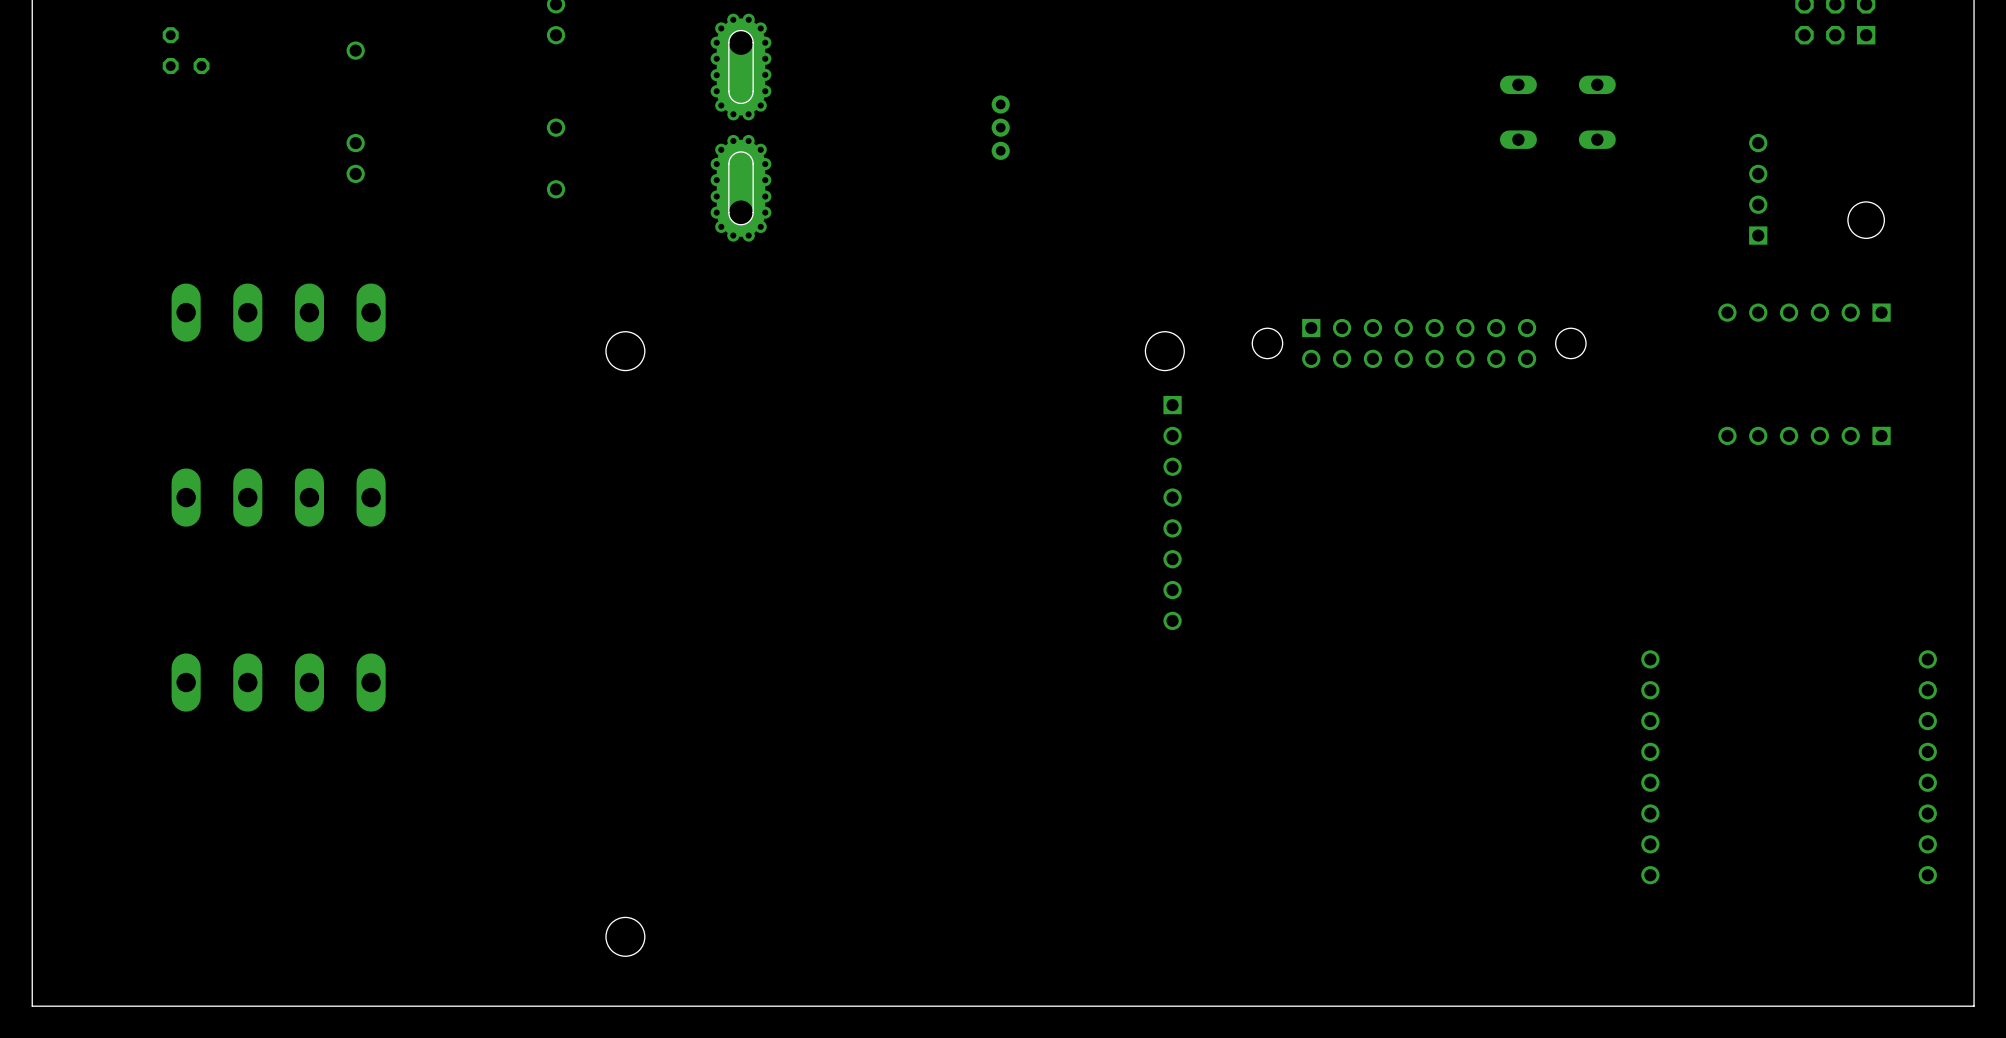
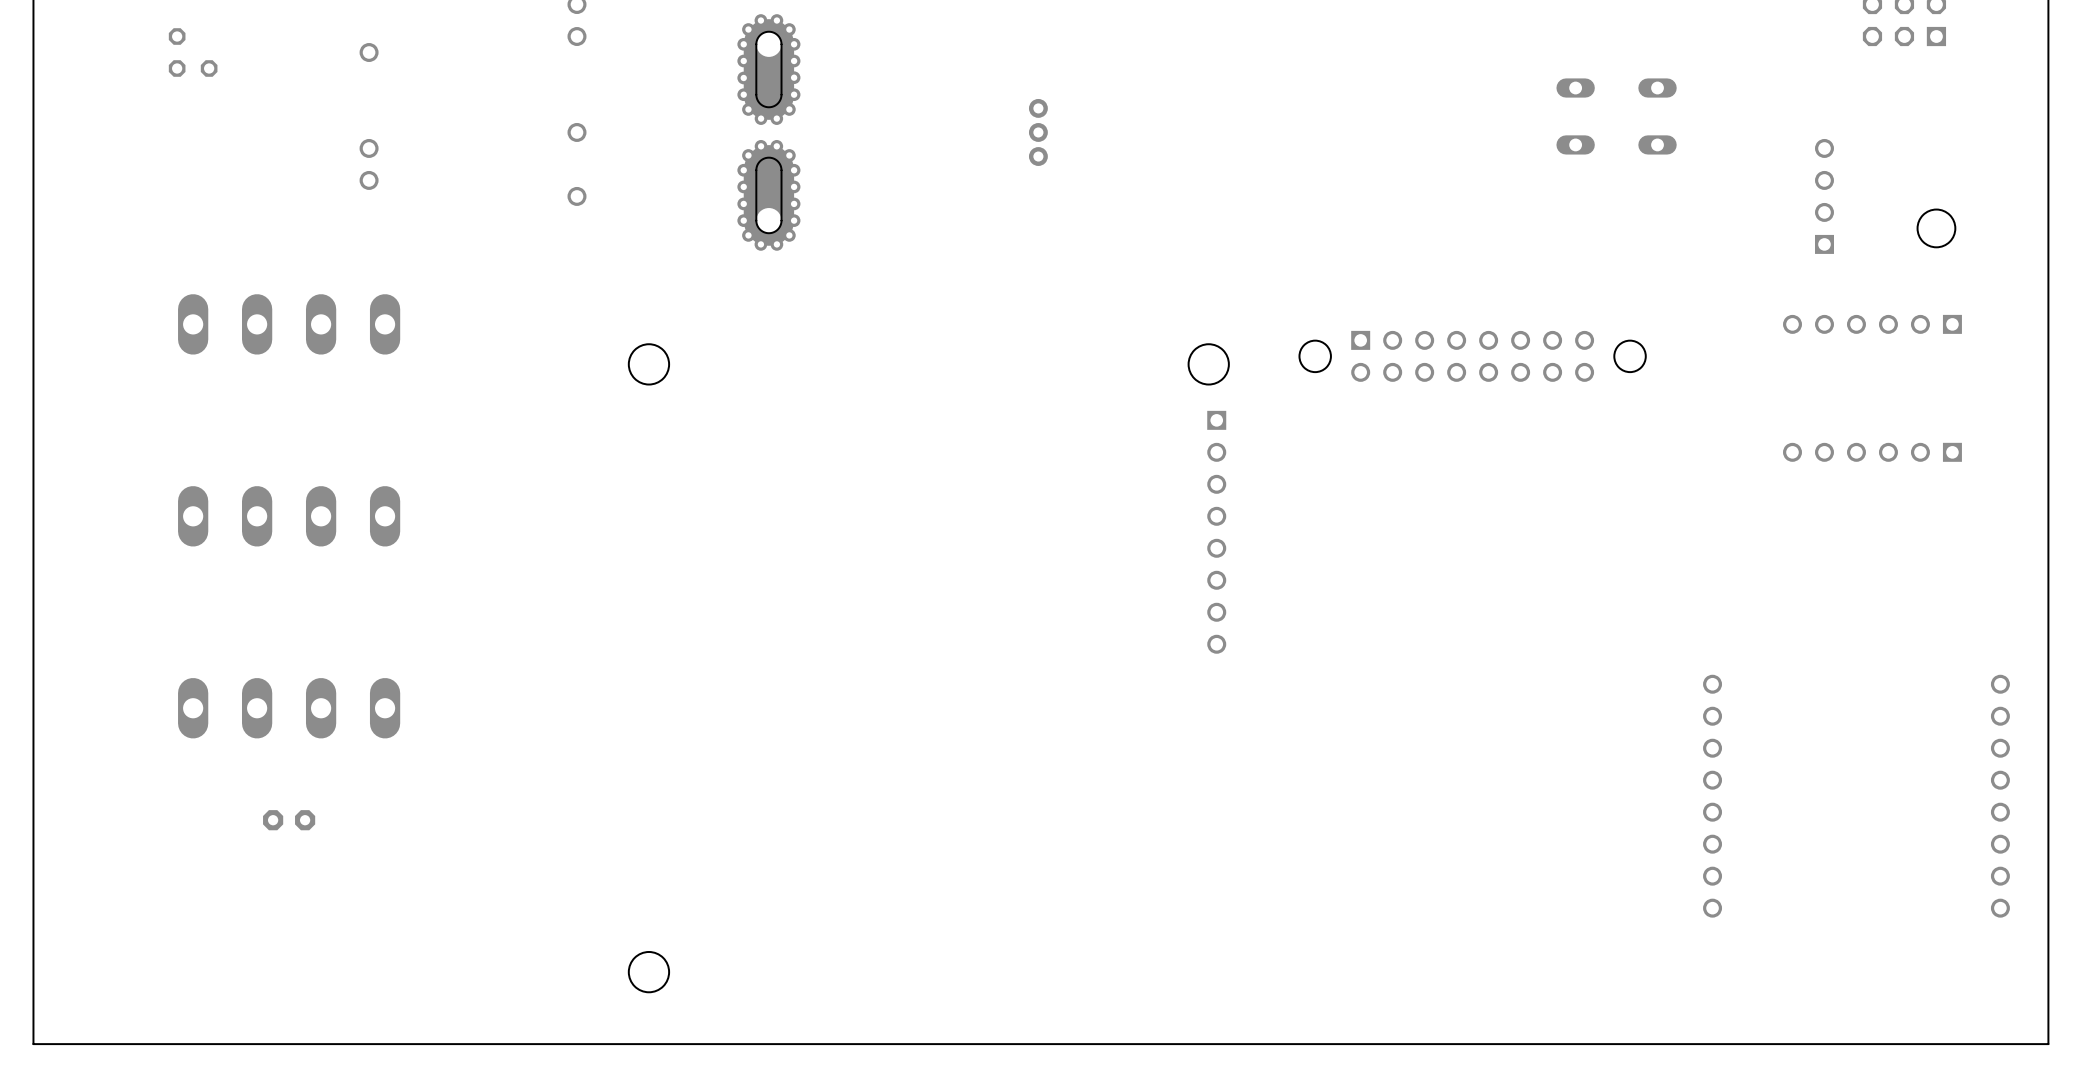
part: none -> (289, 820)

